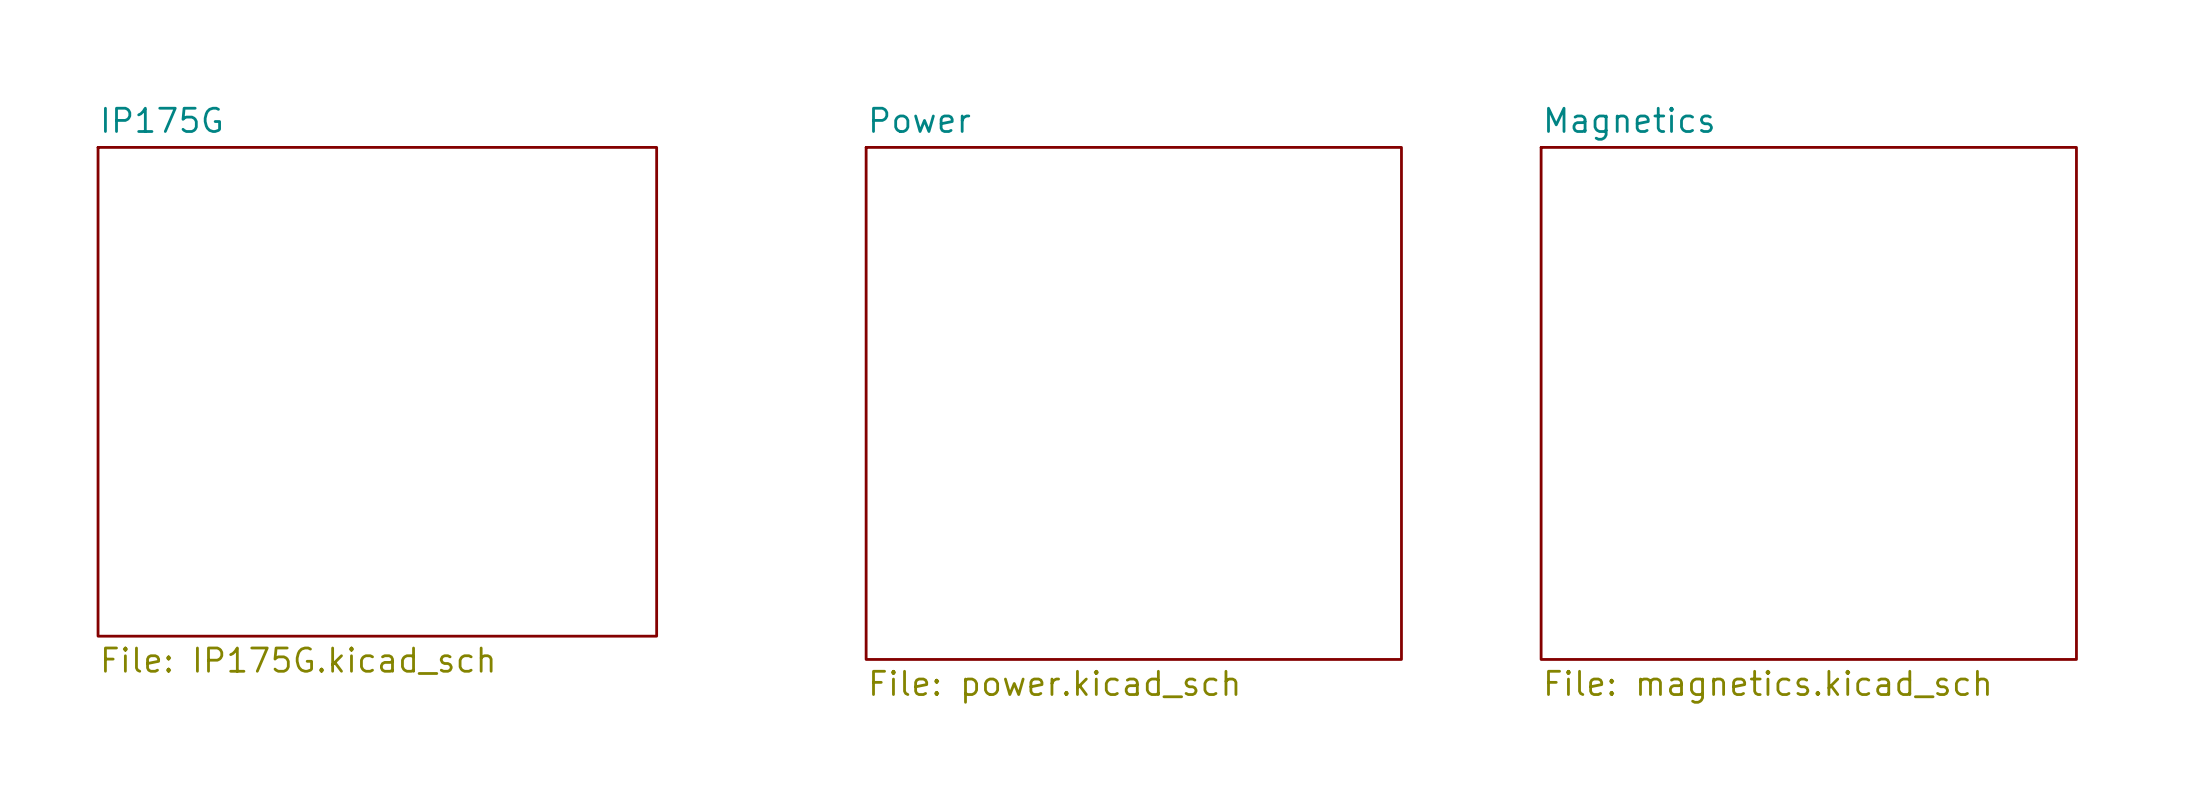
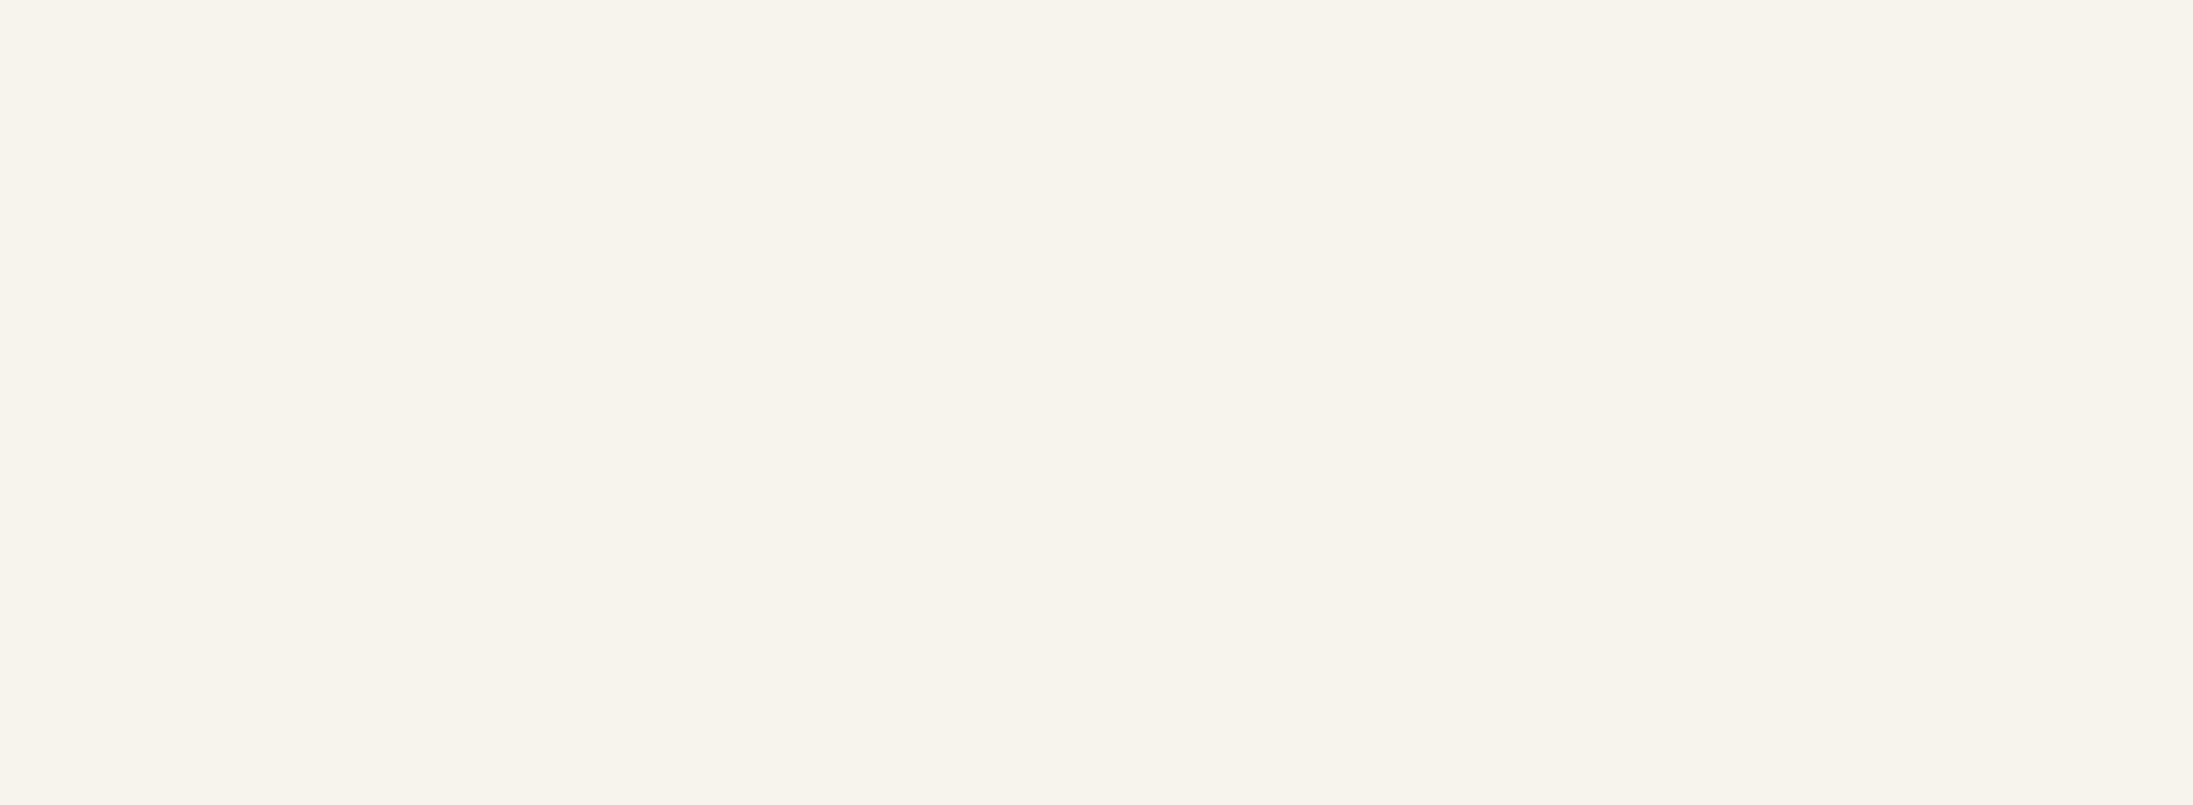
sheet IP175G: File: IP175G.kicad_sch (377, 391) -> none
sheet Power: File: power.kicad_sch (1133, 403) -> none
sheet Magnetics: File: magnetics.kicad_sch (1808, 403) -> none

